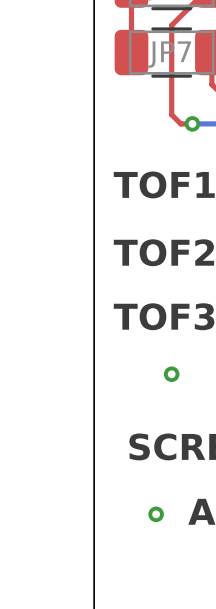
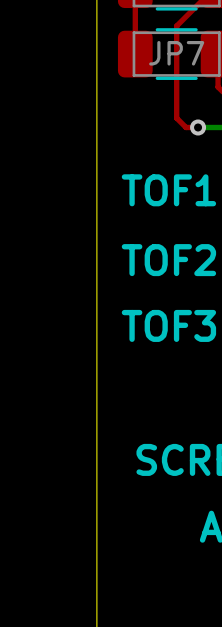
via: (171, 374) -> none
via: (156, 514) -> none

